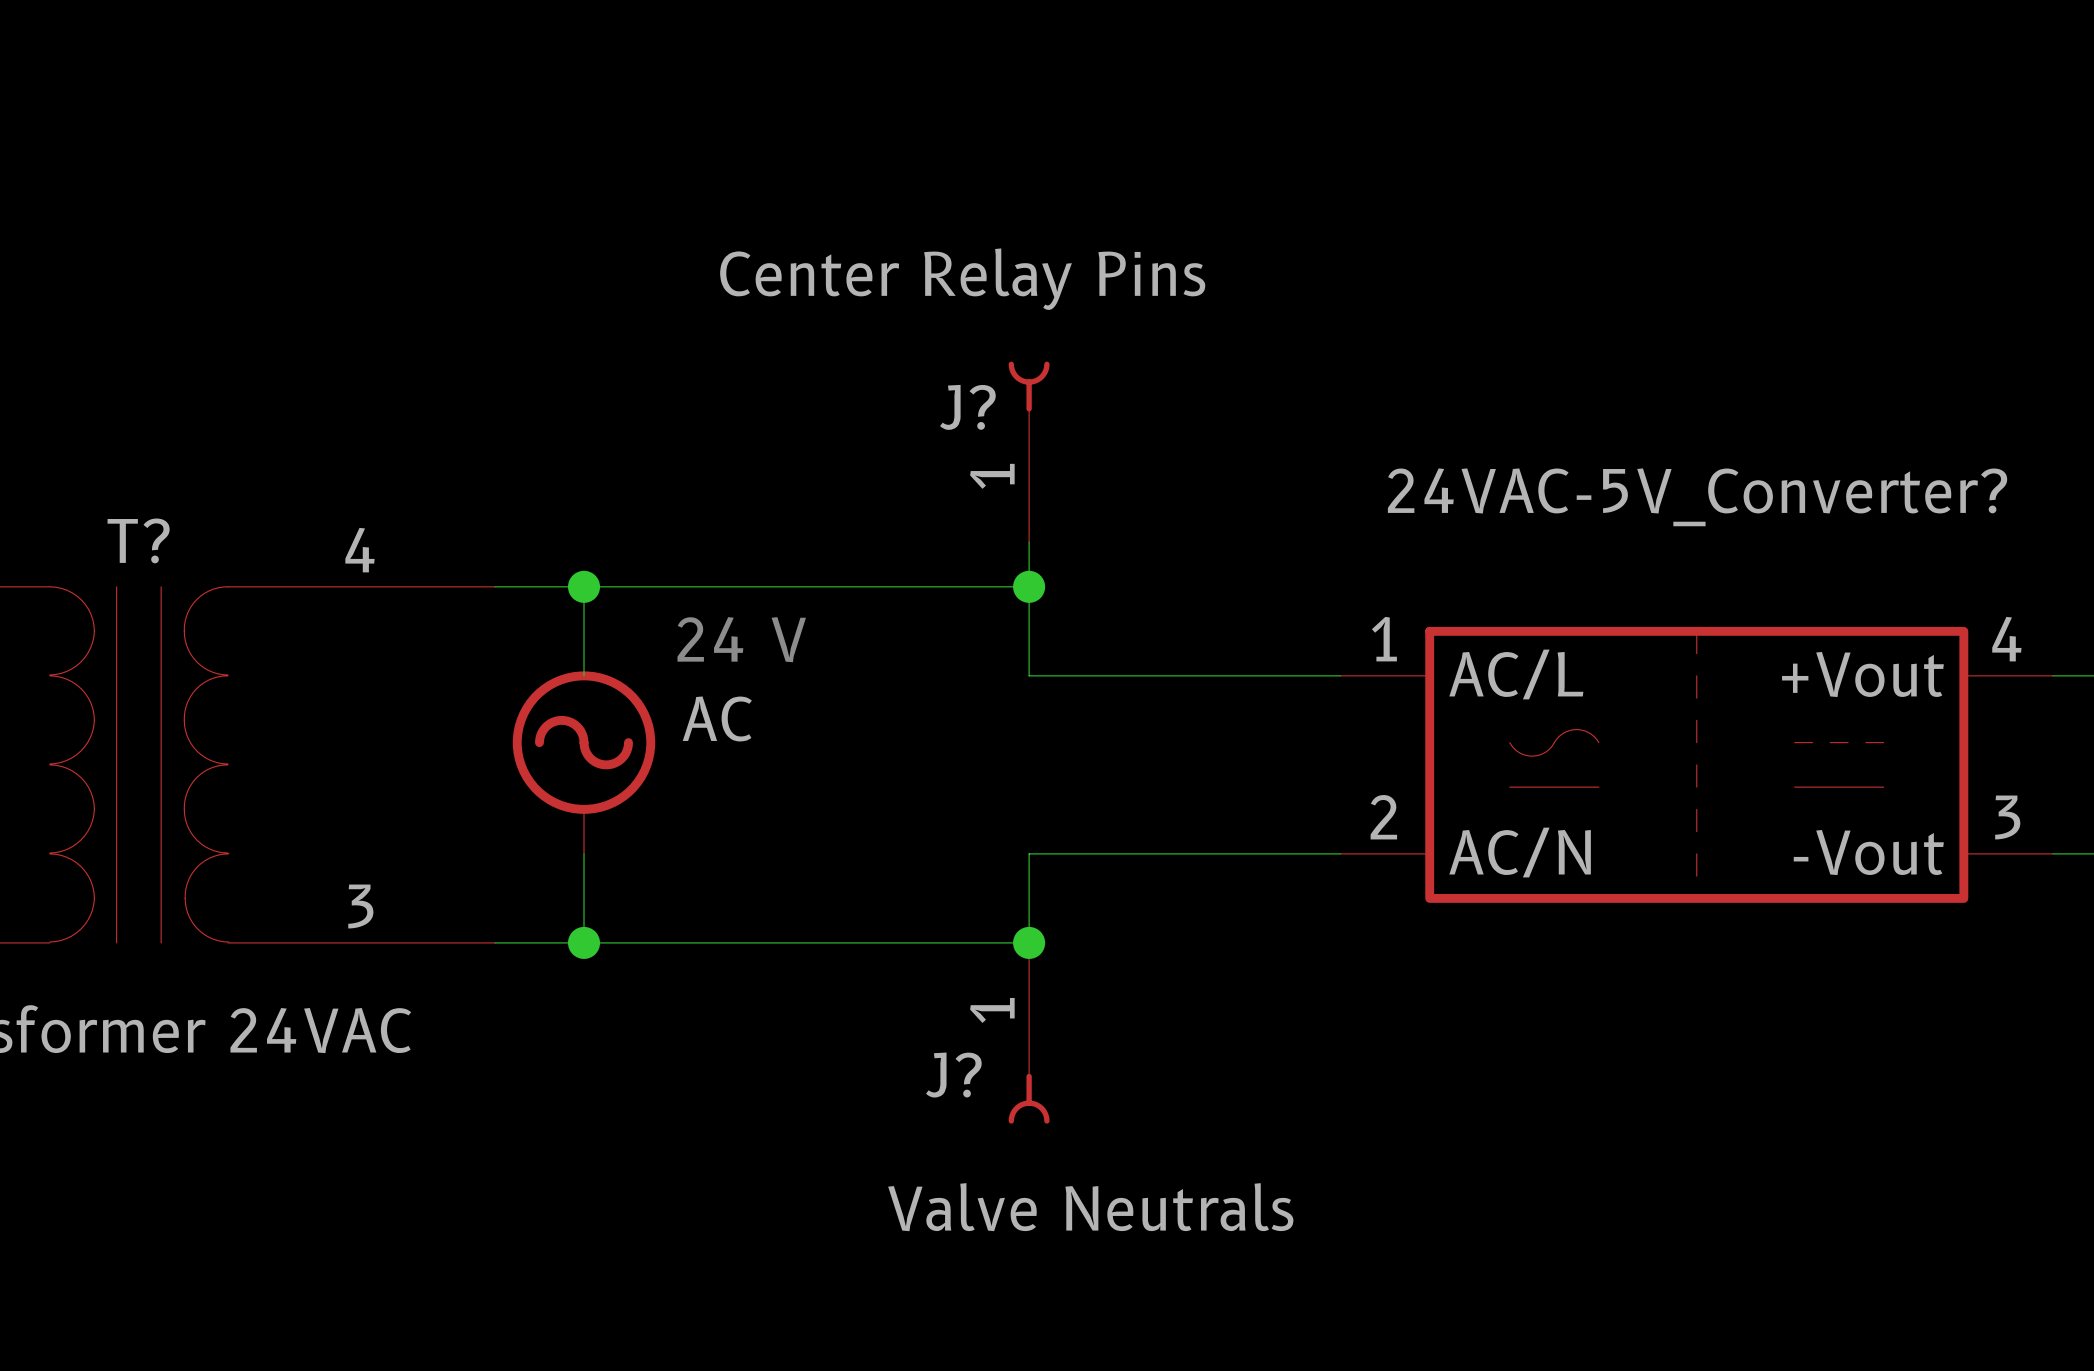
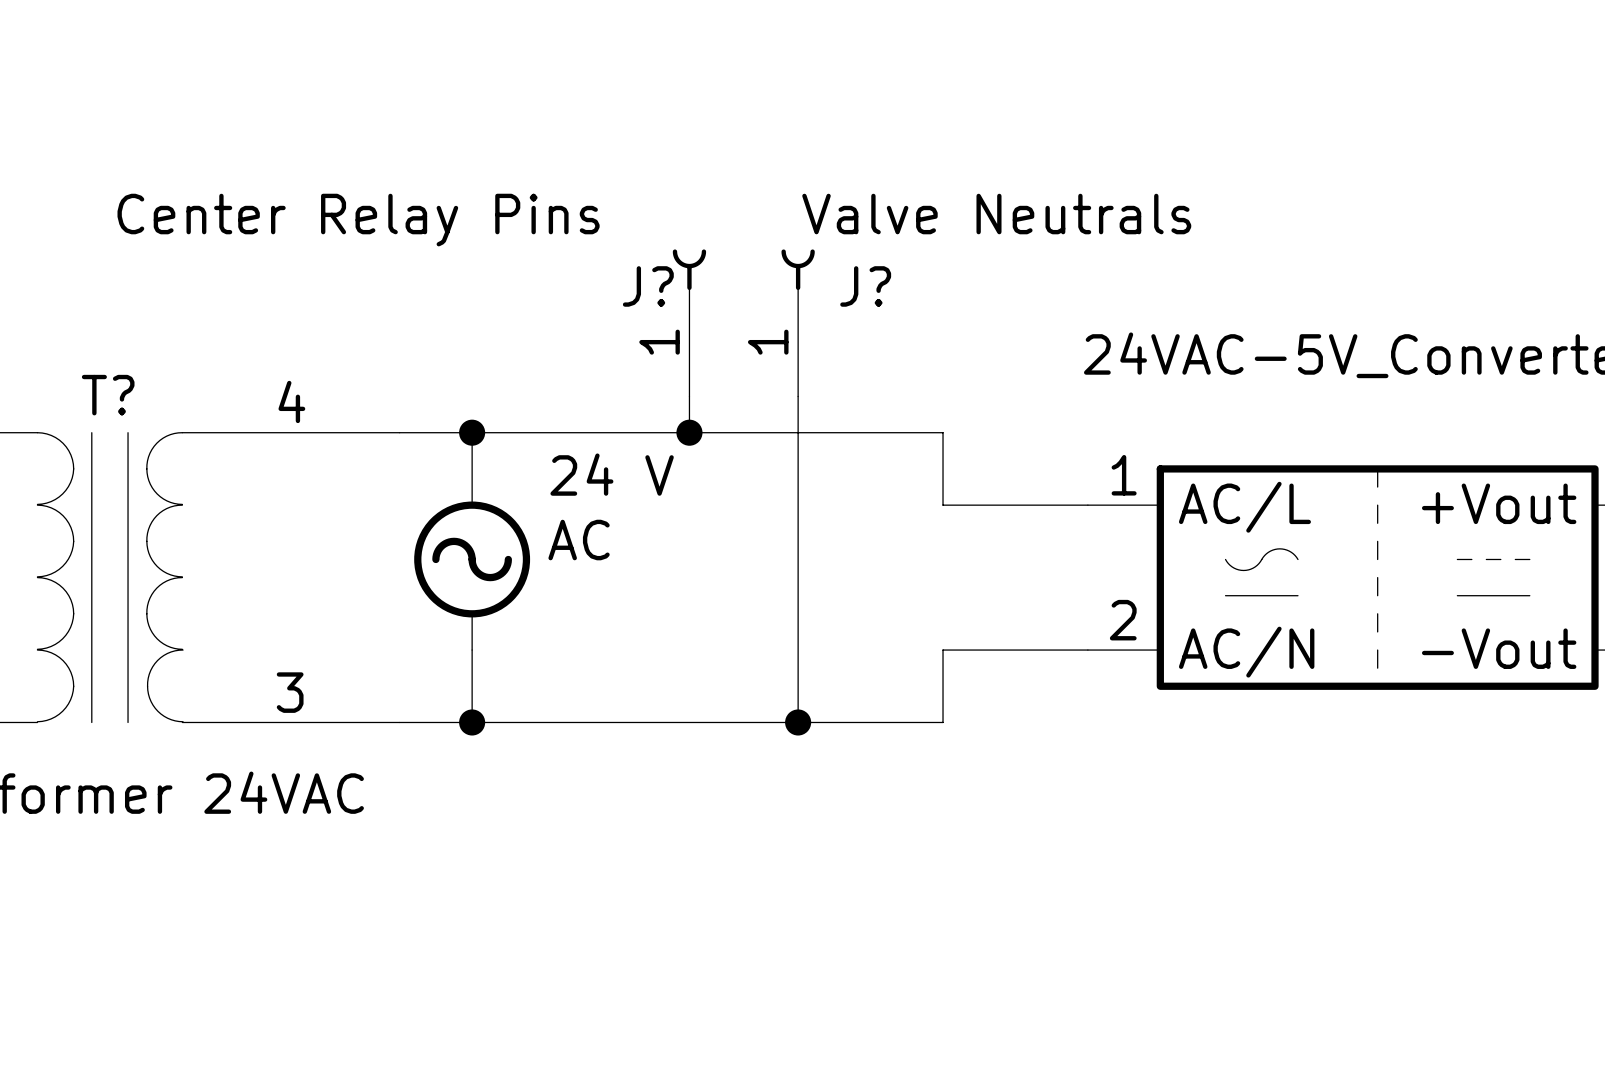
J? value position: Center Relay Pins (962, 279) -> Center Relay Pins (358, 220)
J? position: (1029, 451) -> (689, 322)
wire: none -> (689, 396) (689, 432)
wire: none -> (798, 396) (798, 722)
wire: (1029, 542) (1029, 675) (1162, 675) -> (834, 432) (943, 432) (943, 505)
junction position: (1029, 586) -> (689, 432)
wire: (1162, 853) (1029, 853) (1029, 942) -> (943, 650) (943, 722) (834, 722)
junction position: (1029, 942) -> (798, 722)
J? position: (1029, 1033) -> (798, 322)
J? rotation: 0° (1029, 1098) -> 180° (798, 269)
J? value position: Valve Neutrals (1090, 1207) -> Valve Neutrals (996, 214)

